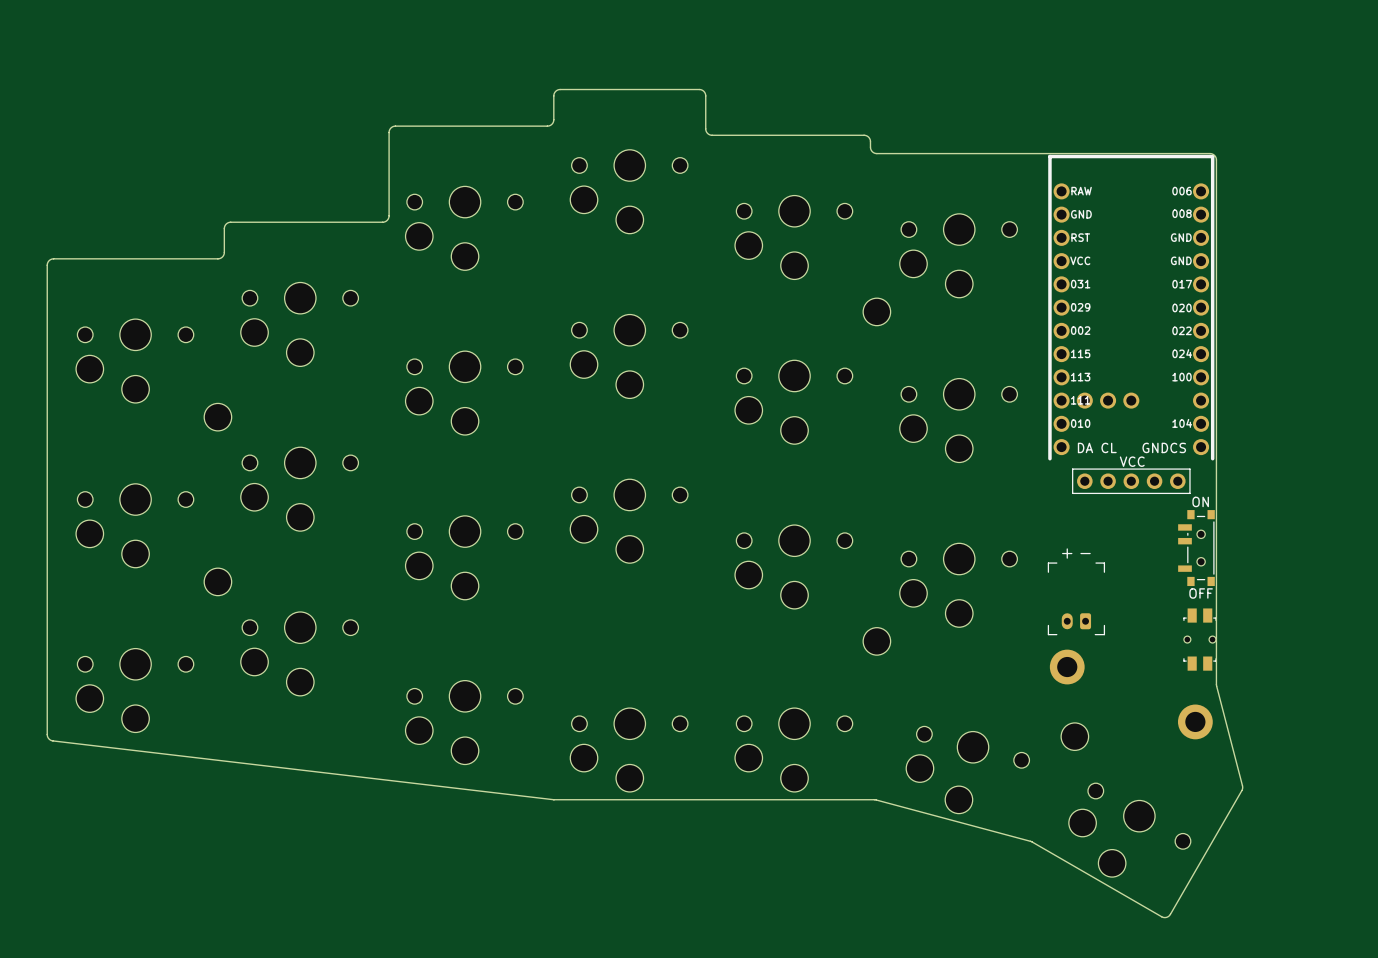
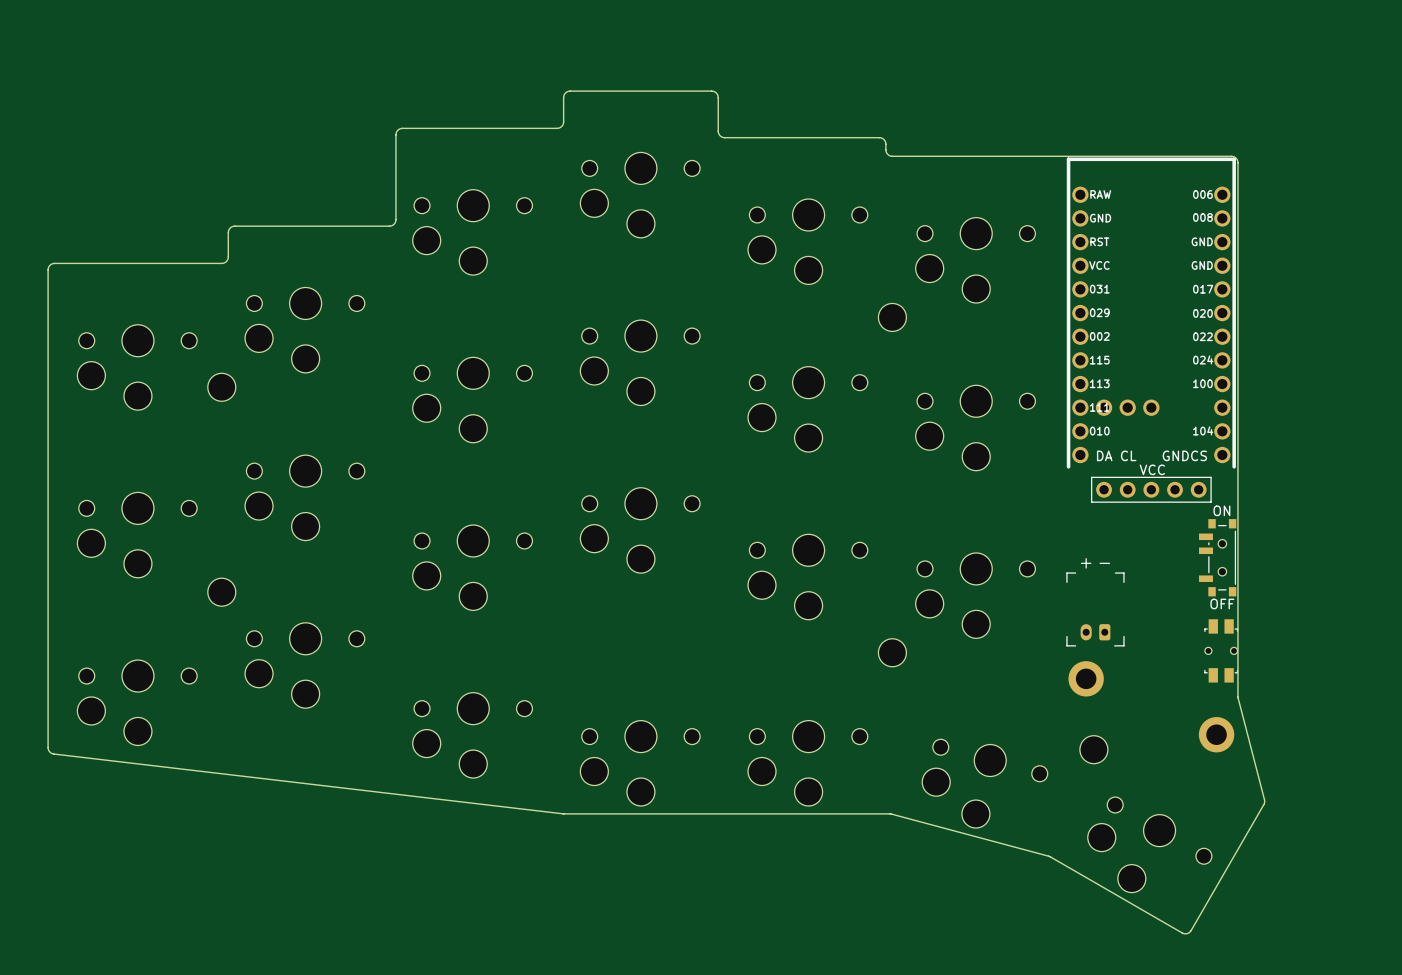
part position: (217, 417) -> (221, 387)

